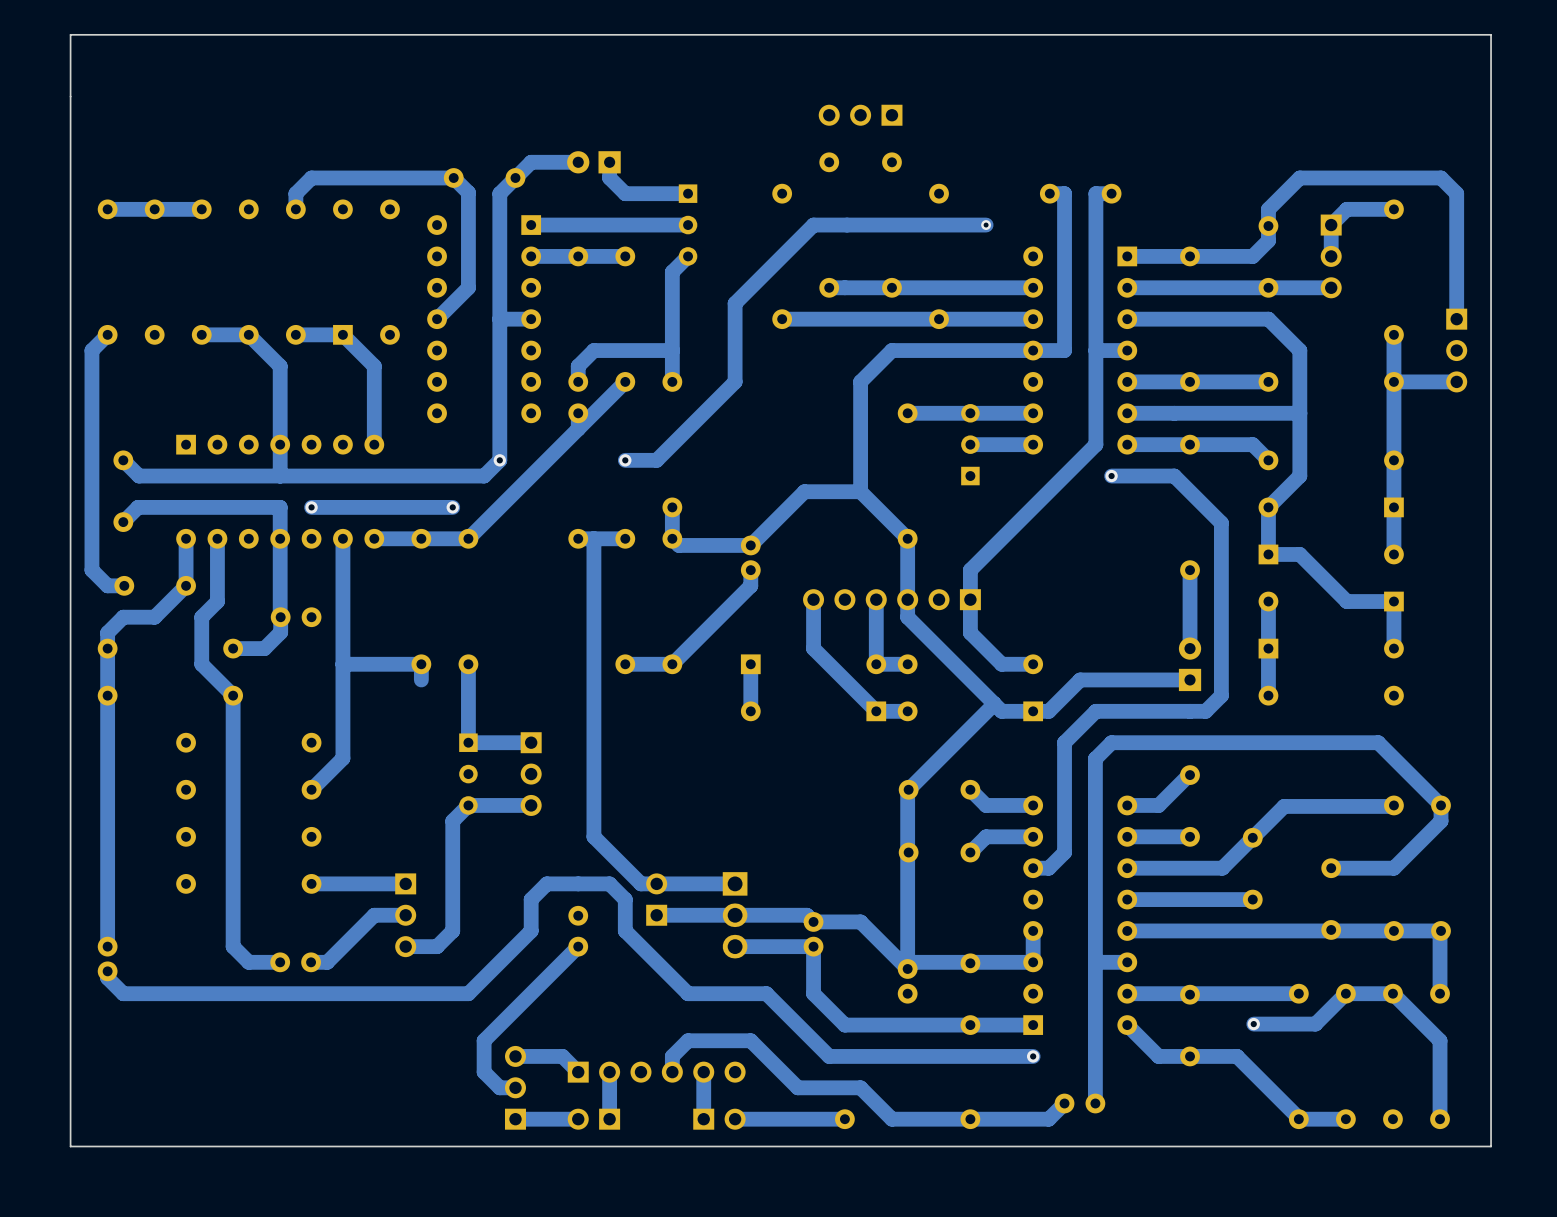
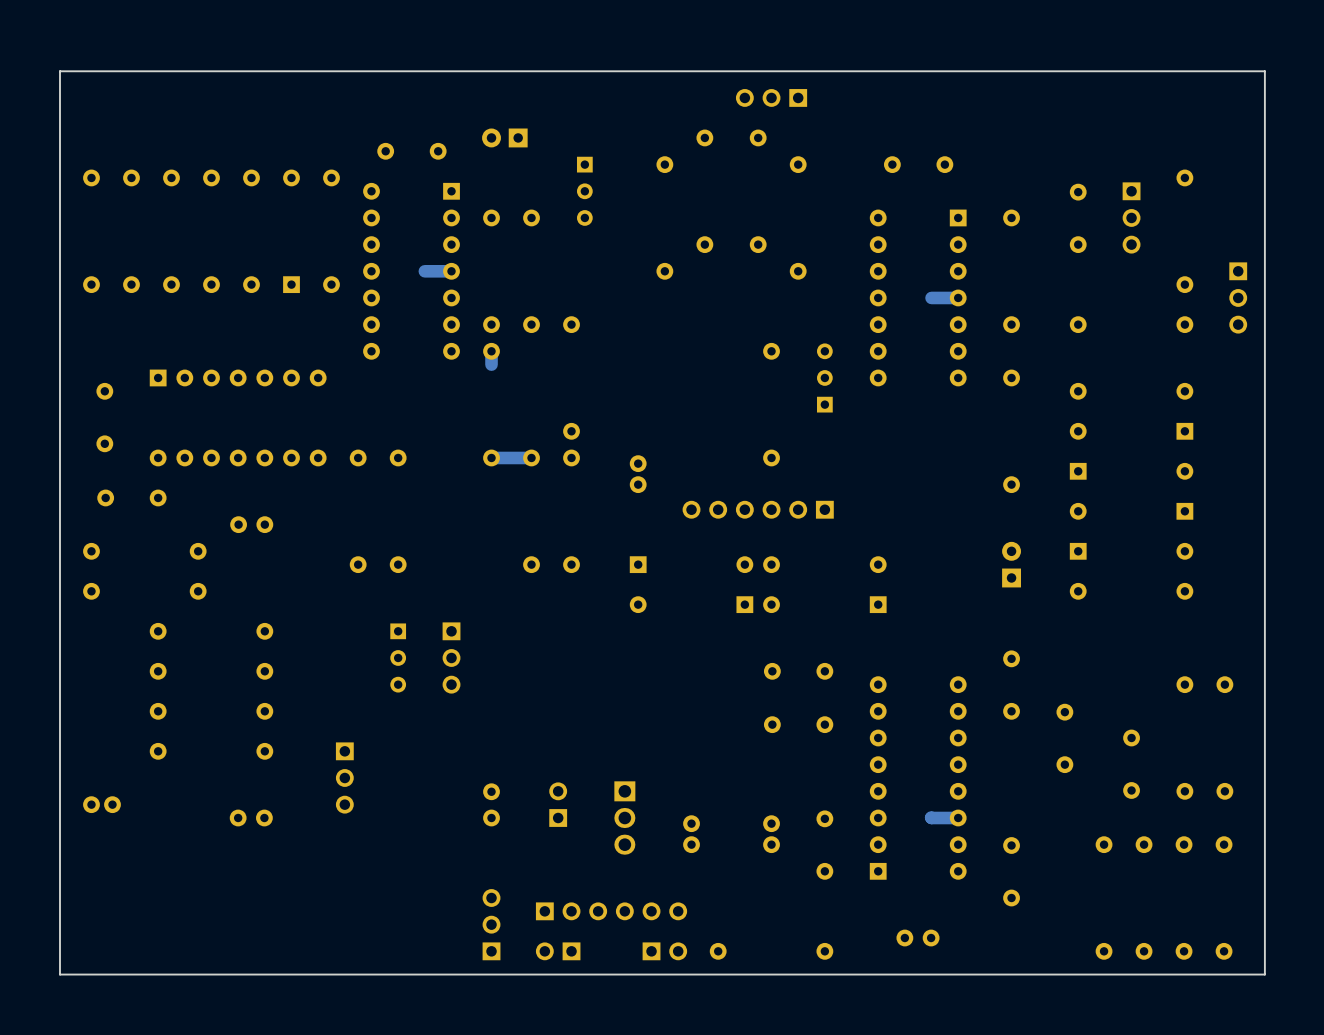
board edge: (70, 83) (70, 34) (1491, 34) (1491, 1146) (1488, 1146) -> (59, 71) (1264, 71) (1264, 974)
part position: (860, 115) -> (771, 97)
track: (578, 162) (531, 162) (499, 193) (499, 460) (484, 476) (139, 476) (123, 460) -> none
track: (609, 162) (609, 177) (625, 193) (688, 193) -> none
track: (1049, 193) (1064, 193) (1064, 350) (891, 350) (860, 381) (860, 491) -> none
track: (1111, 193) (1095, 193) (1095, 444) (970, 570) (970, 632) (1001, 664) (1033, 664) -> none
track: (201, 209) (107, 209) -> none
track: (295, 209) (295, 193) (311, 177) (453, 177) (468, 192) (468, 287) (437, 319) -> none
track: (1393, 209) (1346, 209) (1331, 225) (1331, 256) -> none
track: (688, 225) (531, 225) -> none
track: (986, 225) (813, 225) (735, 303) (735, 381) (656, 460) (625, 460) -> none
via: (986, 225) -> none
track: (625, 256) (531, 256) -> none
track: (688, 256) (672, 272) (672, 381) -> none
track: (1127, 256) (1252, 256) (1268, 240) (1268, 209) (1299, 177) (1441, 177) (1456, 193) (1456, 319) -> none
track: (1033, 287) (829, 287) -> none
track: (1331, 287) (1127, 287) -> none
track: (1033, 319) (782, 319) -> none
track: (1127, 319) (1268, 319) (1299, 350) (1299, 476) (1268, 507) (1268, 554) (1299, 554) (1346, 601) (1393, 601) (1393, 648) -> none
track: (107, 334) (91, 350) (91, 570) (107, 585) (124, 585) -> none
track: (201, 334) (248, 334) (280, 366) (280, 476) -> none
track: (295, 334) (342, 334) (374, 366) (374, 444) -> none
track: (1393, 334) (1393, 554) -> none
track: (672, 350) (593, 350) (578, 366) (578, 381) -> none
track: (625, 381) (468, 538) (374, 538) -> none
track: (1268, 381) (1127, 381) -> none
track: (1456, 381) (1393, 381) -> none
track: (1033, 413) (907, 413) -> none
track: (1299, 413) (1127, 413) -> none
track: (1033, 444) (970, 444) -> none
track: (1127, 444) (1252, 444) (1268, 460) -> none
via: (499, 460) -> none
via: (625, 460) -> none
track: (1111, 476) (1174, 476) (1221, 523) (1221, 695) (1205, 711) (1095, 711) (1064, 742) (1064, 852) (1048, 868) (1033, 868) -> none
via: (1111, 476) -> none
track: (860, 491) (907, 538) (907, 617) (1001, 711) (1048, 711) (1080, 679) (1190, 679) -> none
track: (860, 491) (804, 491) (750, 545) (679, 545) (672, 538) (672, 507) -> none
via: (311, 507) -> none
track: (452, 507) (311, 507) -> none
via: (452, 507) -> none
track: (123, 522) (138, 507) (280, 507) (280, 632) (264, 648) (233, 648) -> none
track: (186, 538) (186, 585) (154, 617) (123, 617) (107, 632) (107, 946) -> none
track: (217, 538) (217, 601) (201, 617) (201, 664) (233, 695) (233, 946) (248, 962) (280, 962) -> none
track: (342, 538) (342, 758) (311, 789) -> none
track: (593, 538) (593, 836) (640, 883) (735, 883) -> none
track: (1190, 570) (1190, 648) -> none
track: (750, 572) (750, 585) (672, 664) (625, 664) -> none
track: (813, 599) (813, 648) (876, 711) (907, 711) -> none
track: (876, 599) (876, 664) (907, 664) -> none
track: (1268, 601) (1268, 695) -> none
track: (342, 664) (421, 664) (421, 679) -> none
track: (468, 664) (468, 742) (531, 742) -> none
track: (750, 664) (750, 711) -> none
track: (993, 703) (907, 790) (907, 968) -> none
track: (1190, 775) (1158, 805) (1127, 805) -> none
track: (970, 789) (986, 805) (1033, 805) -> none
track: (531, 805) (468, 805) (452, 821) (452, 930) (437, 946) (405, 946) -> none
track: (1393, 805) (1284, 806) (1222, 868) (1127, 868) -> none
track: (1033, 836) (986, 836) (970, 852) -> none
track: (1190, 836) (1127, 836) -> none
track: (1331, 868) (1393, 868) (1441, 821) (1441, 805) (1378, 742) (1111, 742) (1095, 758) (1095, 1103) -> none
track: (405, 883) (311, 883) -> none
part position: (656, 899) -> (558, 804)
track: (1252, 899) (1127, 899) -> none
track: (405, 915) (374, 915) (327, 962) (311, 962) -> none
track: (656, 915) (806, 915) (813, 921) (860, 921) (907, 968) -> none
part position: (735, 915) -> (624, 818)
track: (1033, 930) (1033, 962) (914, 962) (907, 968) -> none
track: (1127, 930) (1441, 930) (1440, 993) -> none
part position: (578, 931) -> (491, 804)
part position: (813, 934) -> (691, 834)
track: (578, 946) (484, 1040) (484, 1072) (499, 1087) (515, 1087) -> none
track: (735, 946) (813, 946) (813, 993) (844, 1025) (1033, 1025) -> none
part rotation: 0° (107, 958) -> 90° clockwise (101, 804)
track: (107, 971) (107, 978) (123, 993) (468, 993) (531, 930) (531, 899) (546, 883) (609, 883) (625, 899) (625, 930) (688, 993) (766, 993) (829, 1056) (1033, 1056) -> none
track: (1298, 993) (1127, 993) -> none
track: (1253, 1024) (1315, 1024) (1345, 993) (1392, 993) (1440, 1040) (1440, 1119) -> none
via: (1253, 1024) -> none
track: (1127, 1025) (1158, 1056) (1237, 1056) (1299, 1119) (1345, 1119) -> none
track: (515, 1056) (562, 1056) (578, 1072) -> none
via: (1033, 1056) -> none
track: (609, 1072) (609, 1119) -> none
part position: (656, 1072) -> (611, 911)
track: (672, 1072) (672, 1056) (688, 1040) (750, 1040) (797, 1087) (860, 1087) (891, 1119) (1048, 1119) (1064, 1103) -> none
track: (703, 1072) (703, 1119) -> none
part position: (515, 1087) -> (491, 924)
track: (578, 1119) (515, 1119) -> none
part: (593, 1119) -> none
part: none -> (558, 951)
part: (719, 1119) -> none
part: none -> (664, 951)
track: (844, 1119) (735, 1119) -> none

